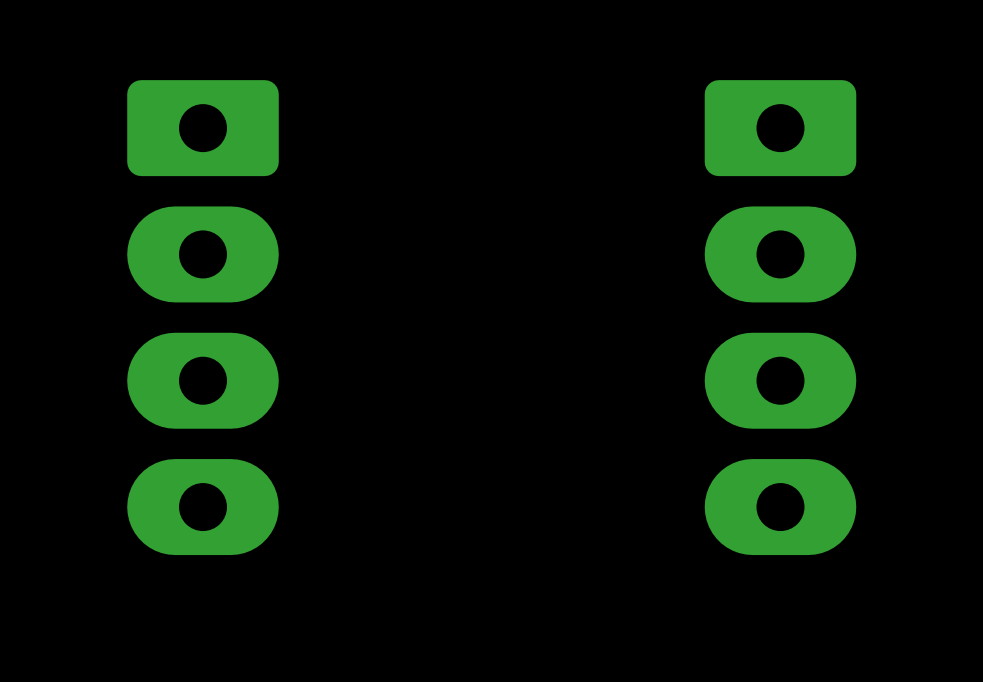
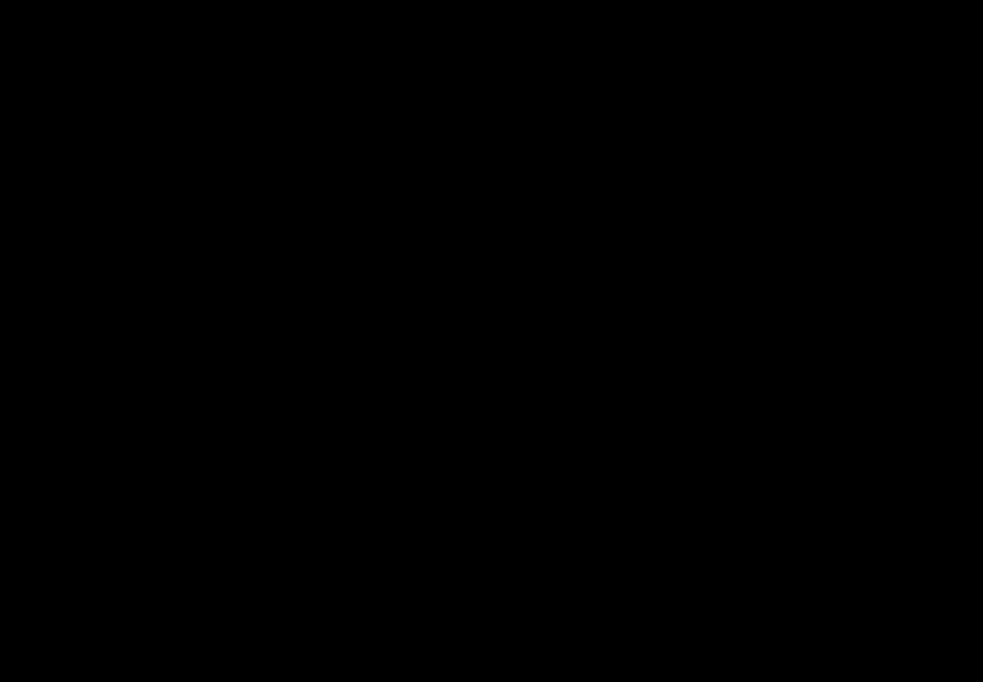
part: (203, 317) -> none
part: (780, 317) -> none

